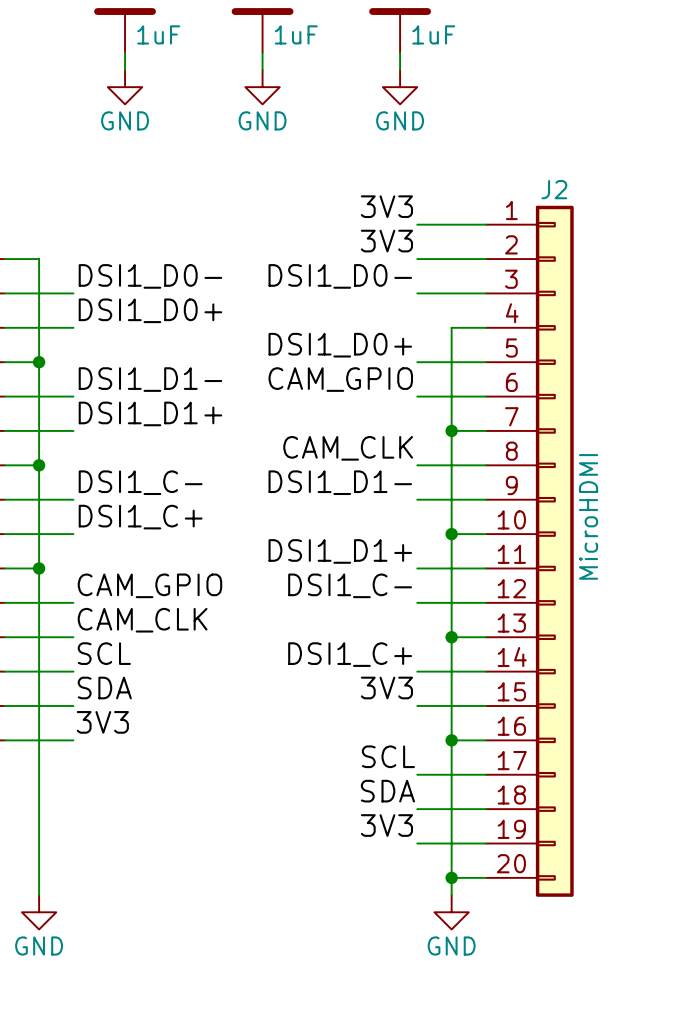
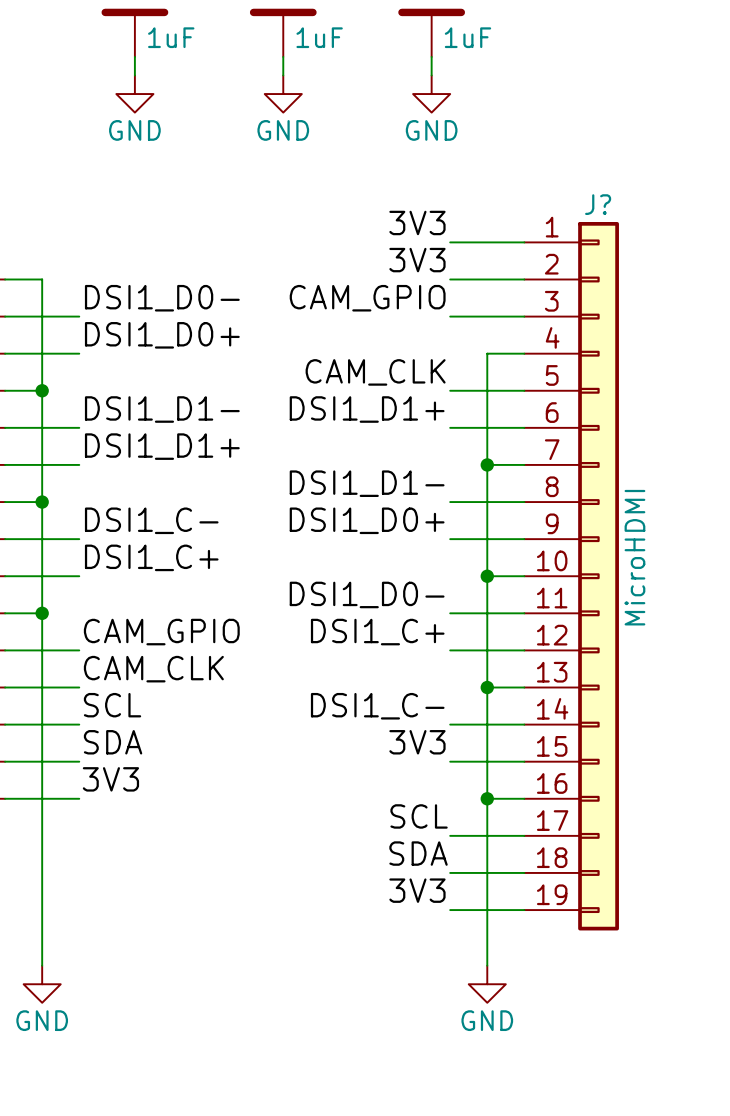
label: DSI1_D0- (340, 276) -> CAM_GPIO (367, 298)
label: DSI1_D0+ (340, 345) -> CAM_CLK (375, 372)
label: CAM_GPIO (340, 379) -> DSI1_D1+ (367, 409)
label: CAM_CLK (348, 448) -> DSI1_D1- (367, 483)
label: DSI1_D1- (340, 482) -> DSI1_D0+ (367, 520)
J?: none -> MicroHDMI (571, 576)
label: DSI1_D1+ (340, 551) -> DSI1_D0- (367, 594)
J2: MicroHDMI (529, 551) -> none
label: DSI1_C- (350, 585) -> DSI1_C+ (377, 632)
label: DSI1_C+ (350, 654) -> DSI1_C- (377, 706)
wire: (451, 877) (486, 877) -> none
junction: (451, 877) -> none

